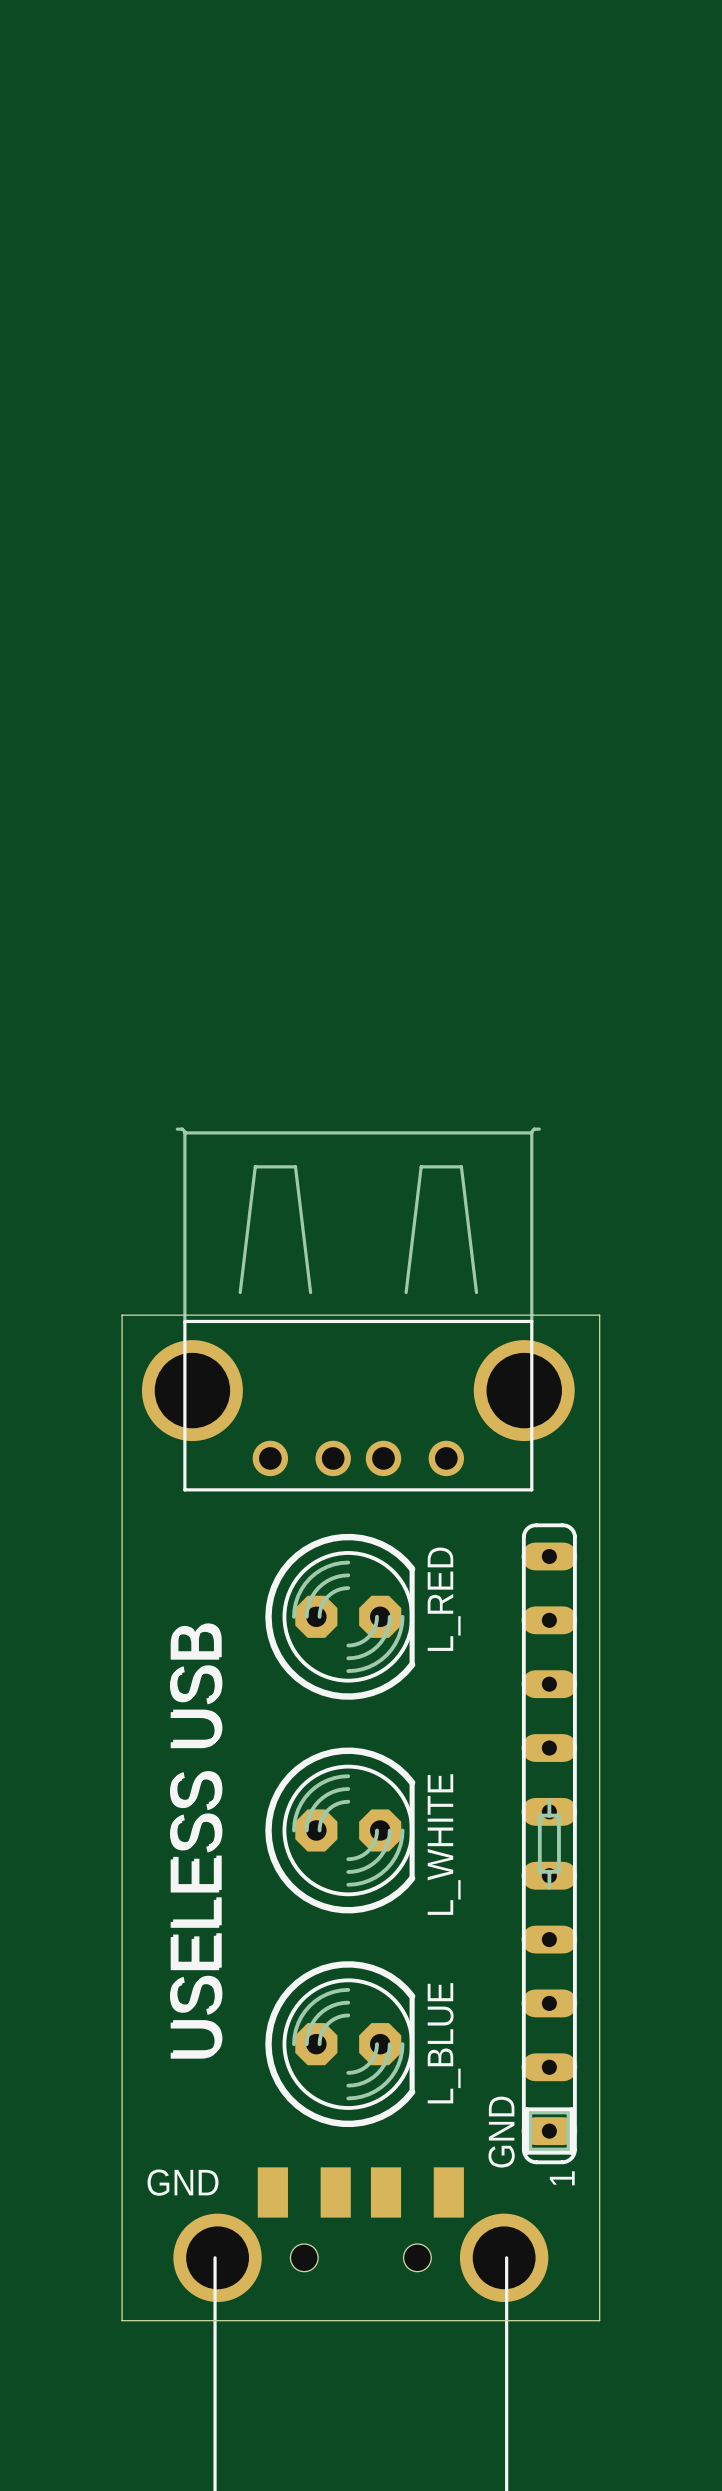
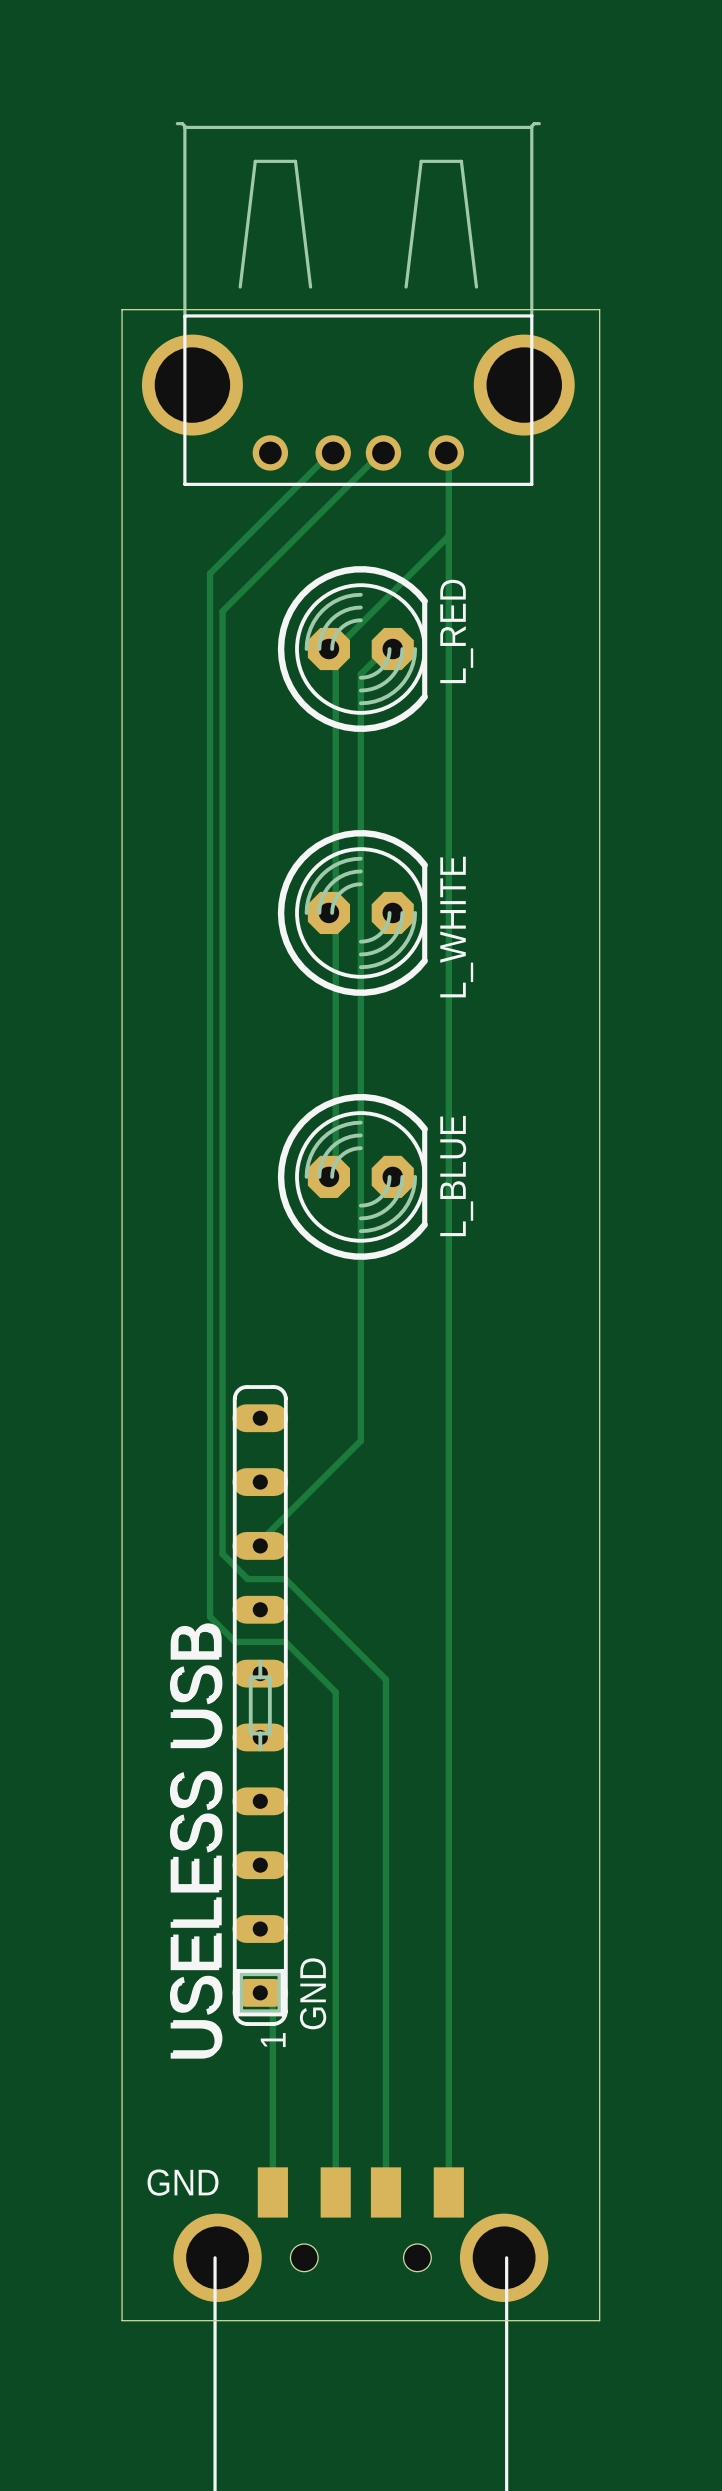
part: none -> (358, 304)
track: none -> (333, 452) (323, 460) (210, 573) (210, 1616) (235, 1641) (285, 1641) (335, 1692) (335, 2192)
track: none -> (383, 452) (373, 460) (222, 611) (222, 1553) (247, 1579) (285, 1579) (385, 1679) (385, 2192)
track: none -> (446, 452) (448, 460) (448, 2192)
track: none -> (448, 535) (335, 649)
track: none -> (335, 649) (335, 1176) (328, 1176)
L_RED: none -> (352, 649)
track: none -> (392, 649) (385, 649) (360, 674) (360, 1440) (260, 1541) (260, 1545)
L_WHITE: none -> (352, 912)
L_BLUE: none -> (352, 1176)
part: (358, 1309) -> none
board edge: (122, 1315) (599, 1315) -> (122, 1315) (122, 309) (599, 309) (599, 1315)
L_RED: (340, 1616) -> none
L_WHITE: (340, 1830) -> none
part position: (549, 1843) -> (260, 1705)
track: none -> (260, 1992) (272, 2006) (272, 2192)
L_BLUE: (340, 2044) -> none
text position: GND (501, 2132) -> GND (313, 1993)

